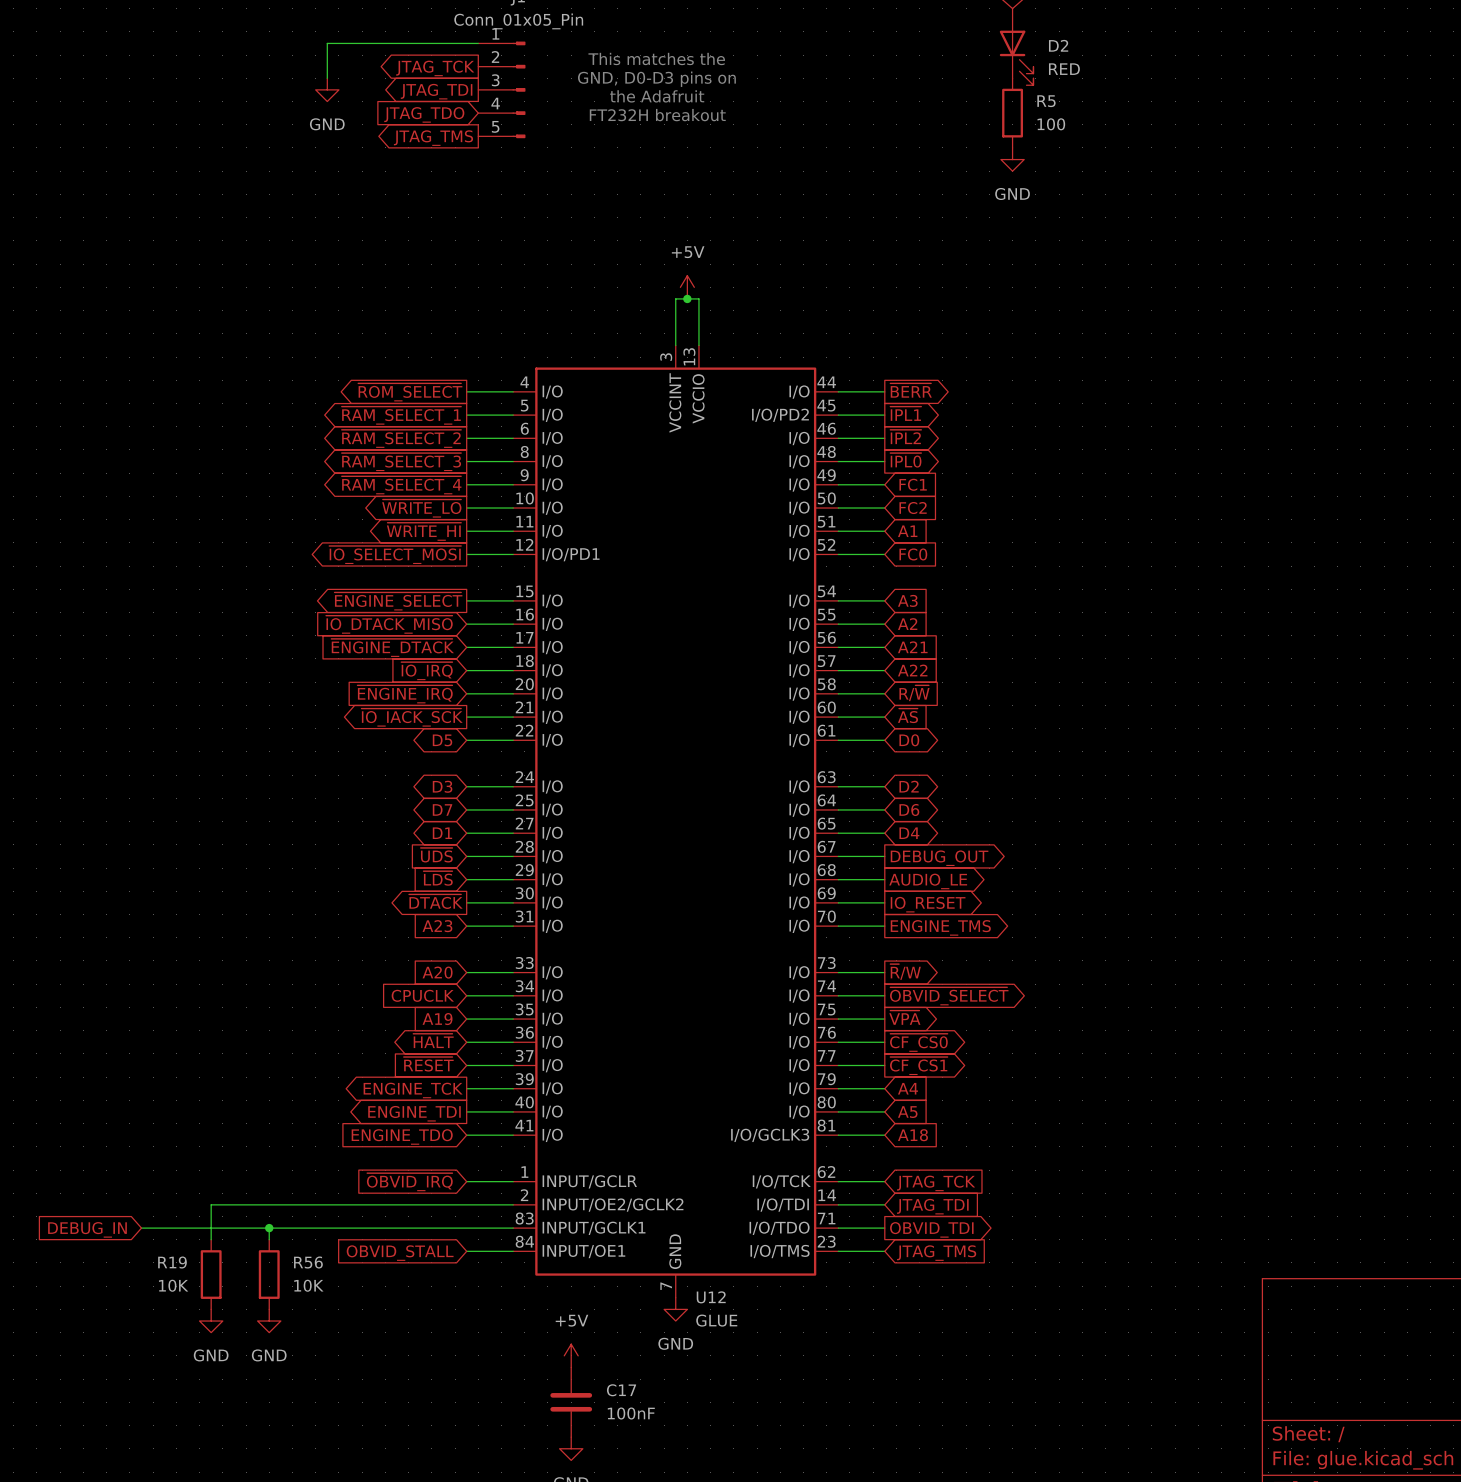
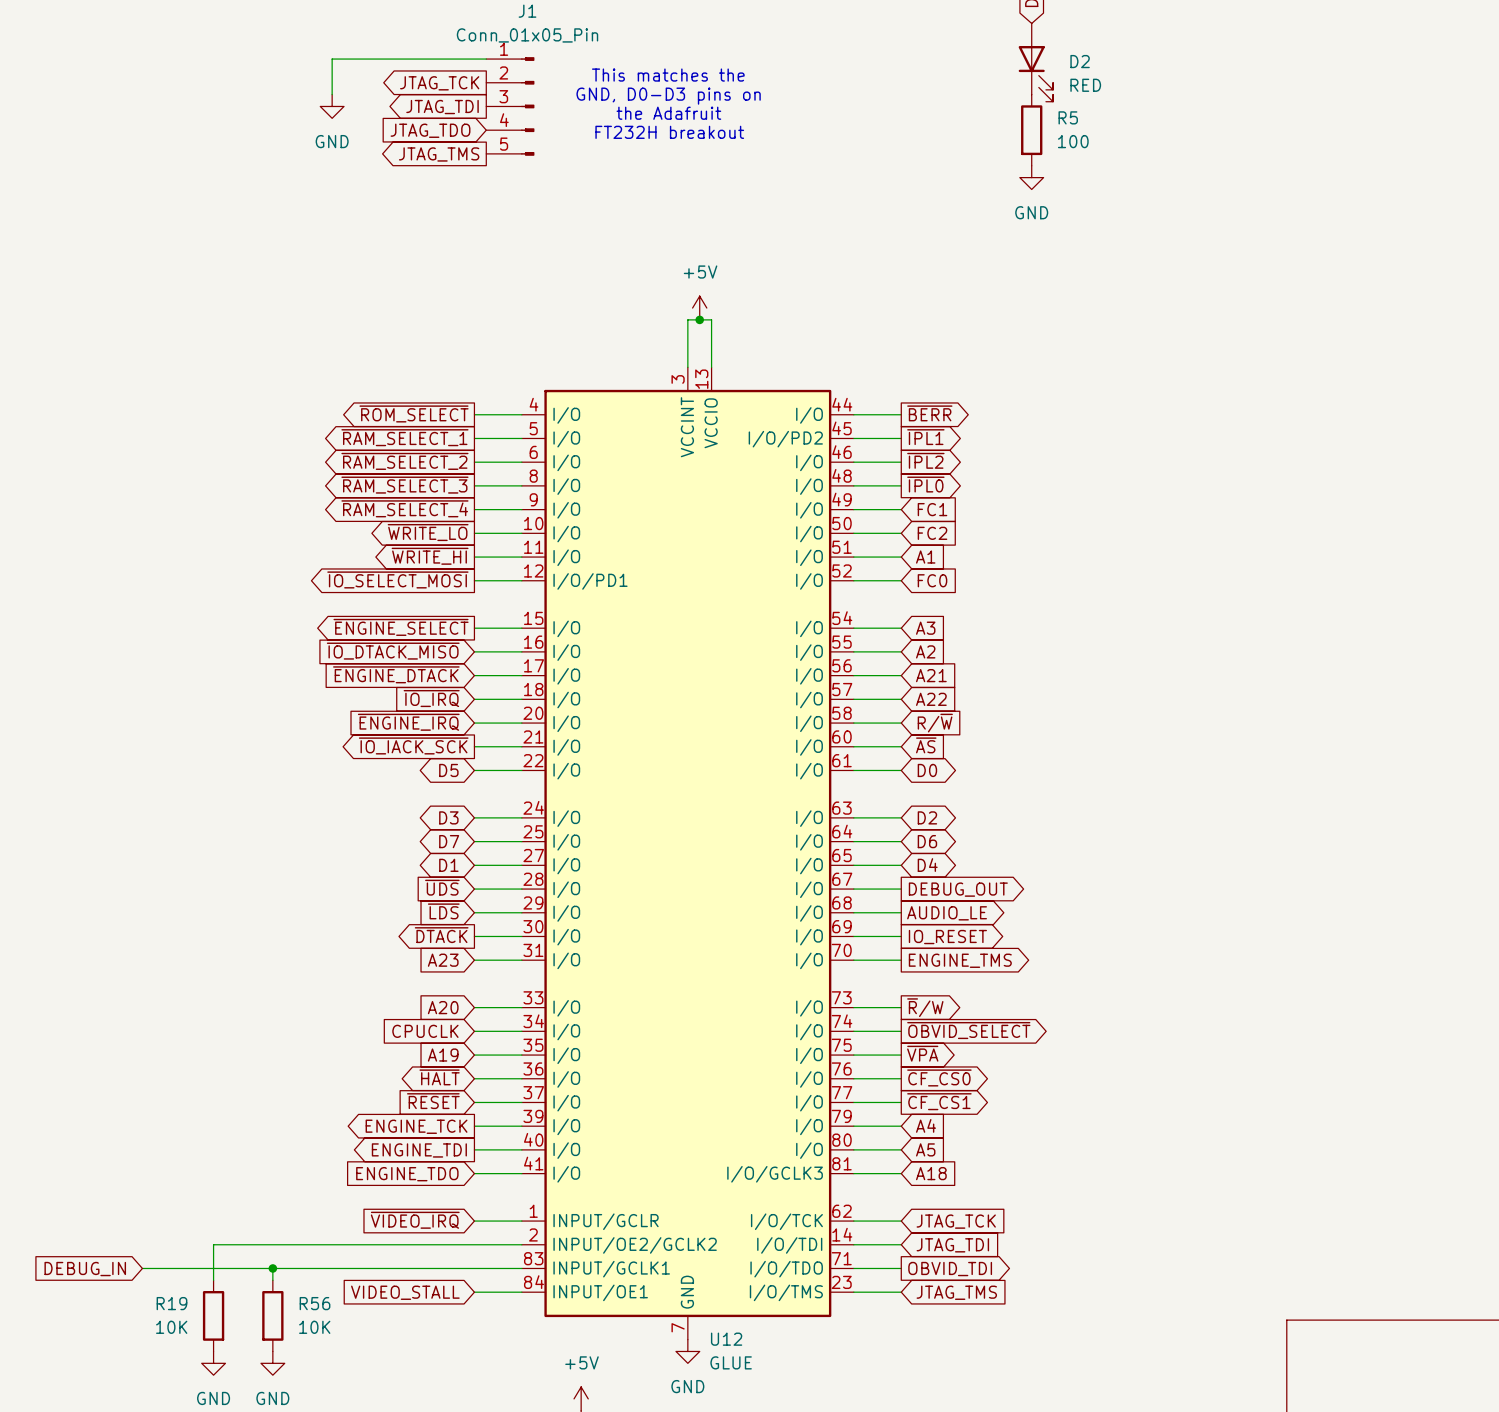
global label: ~{OBVID_IRQ} (409, 1182) -> ~{VIDEO_IRQ} (415, 1220)
global label: OBVID_STALL (400, 1253) -> VIDEO_STALL (405, 1292)

